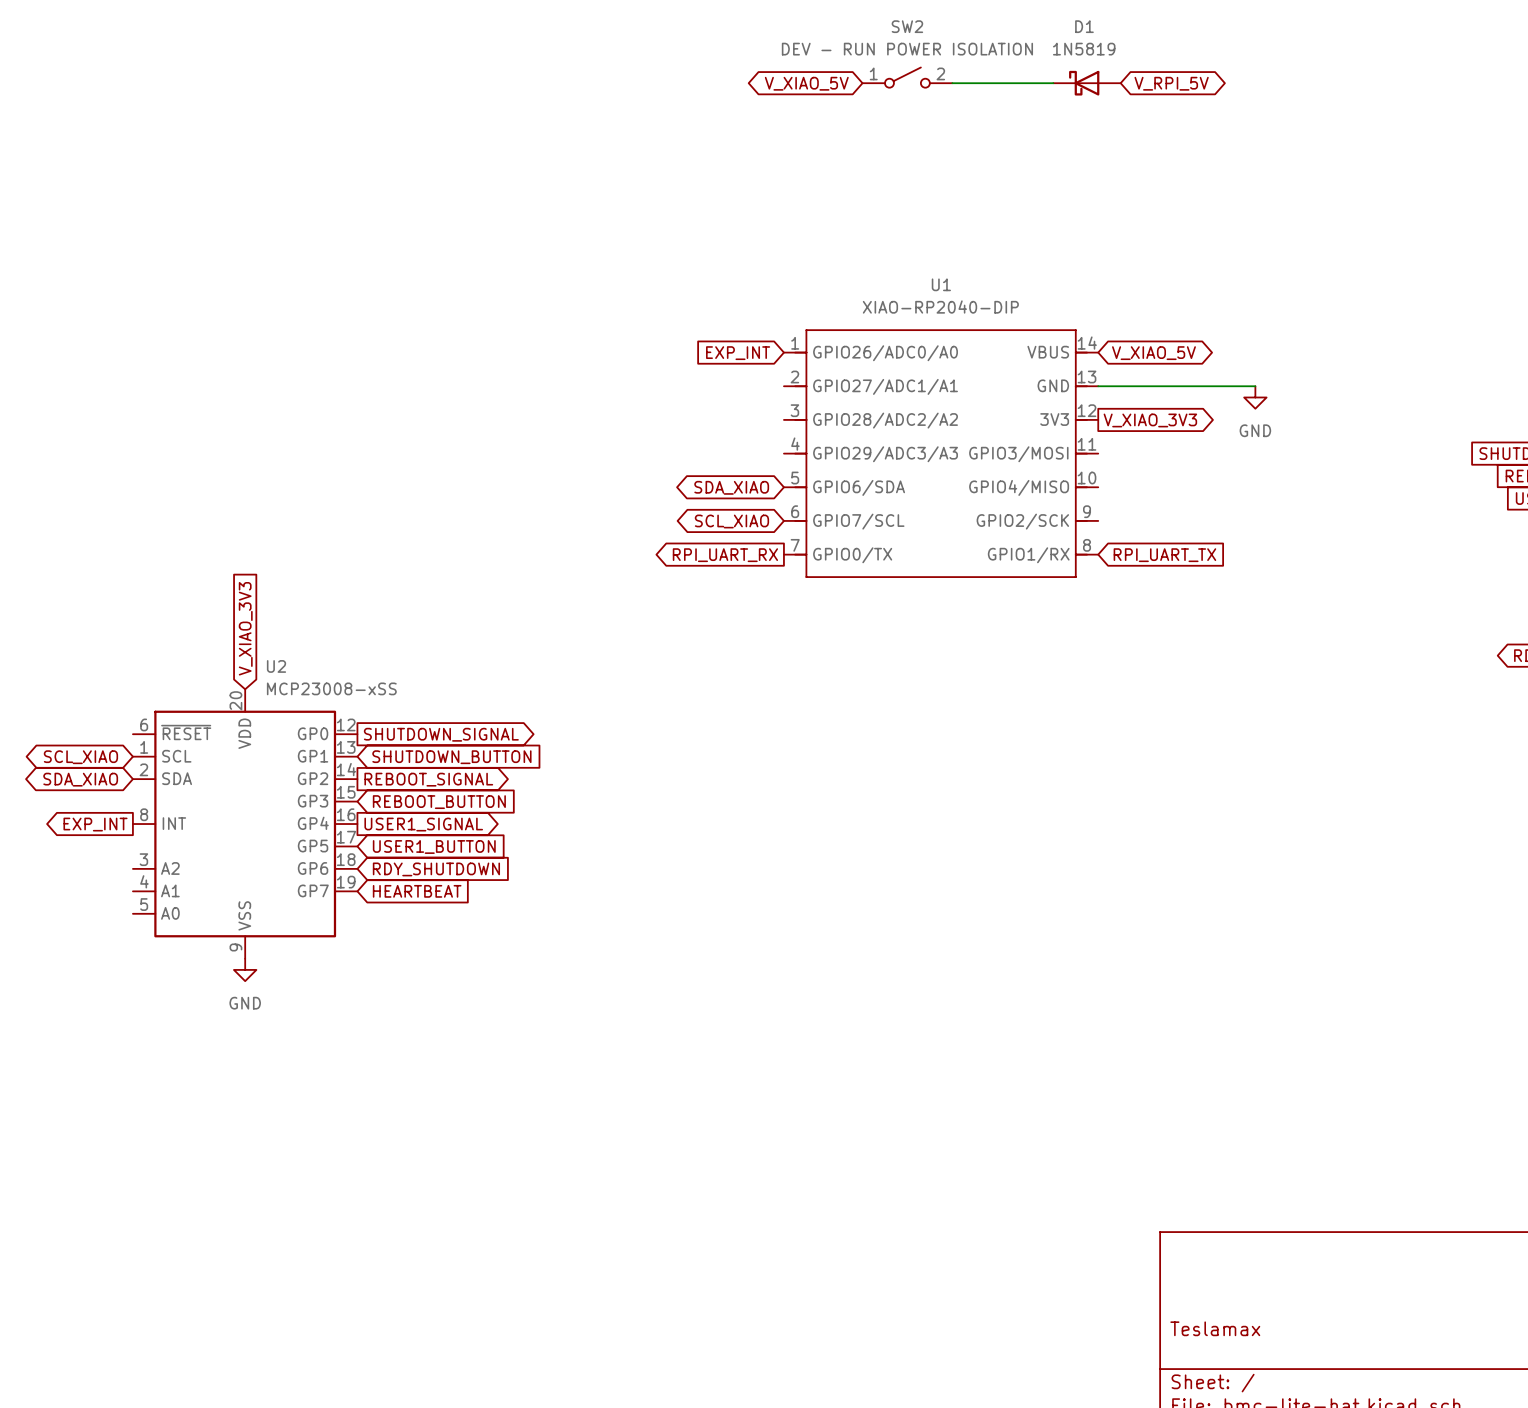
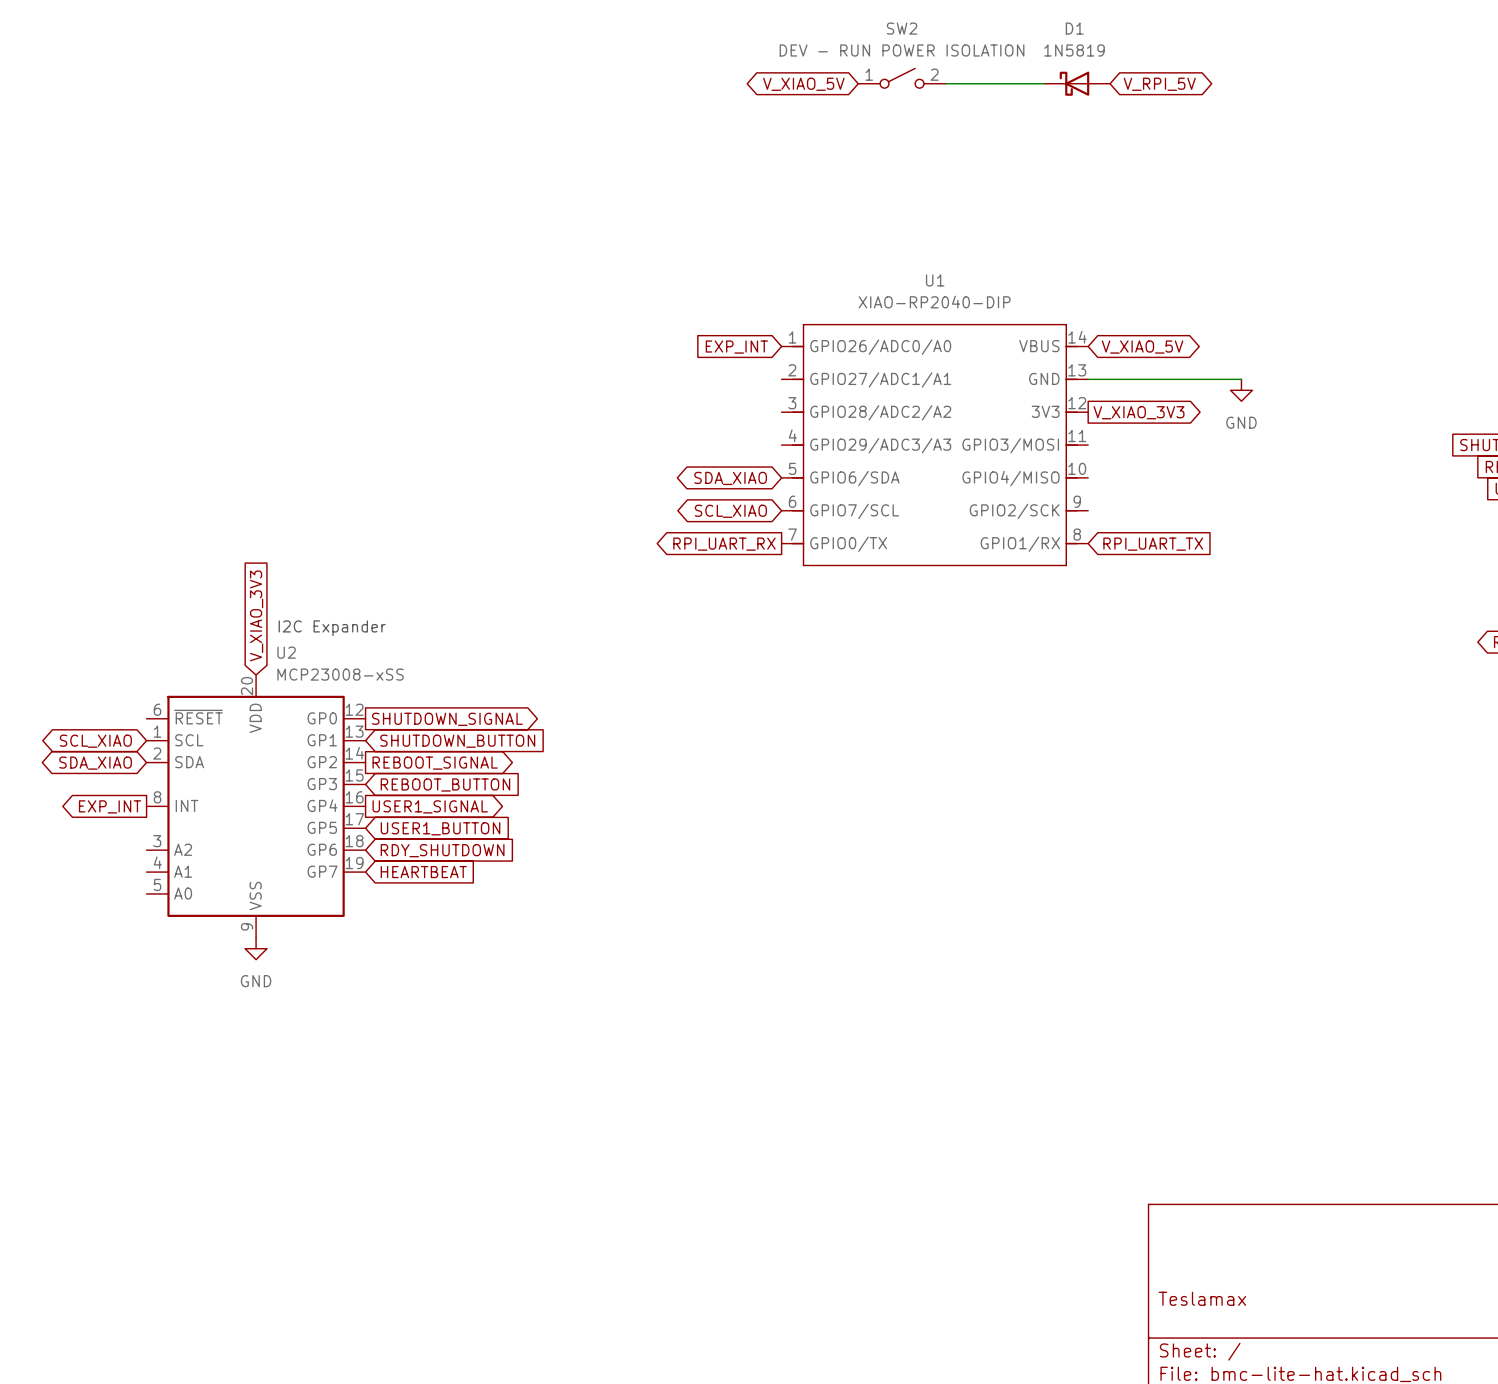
text: none -> I2C Expander (332, 628)

